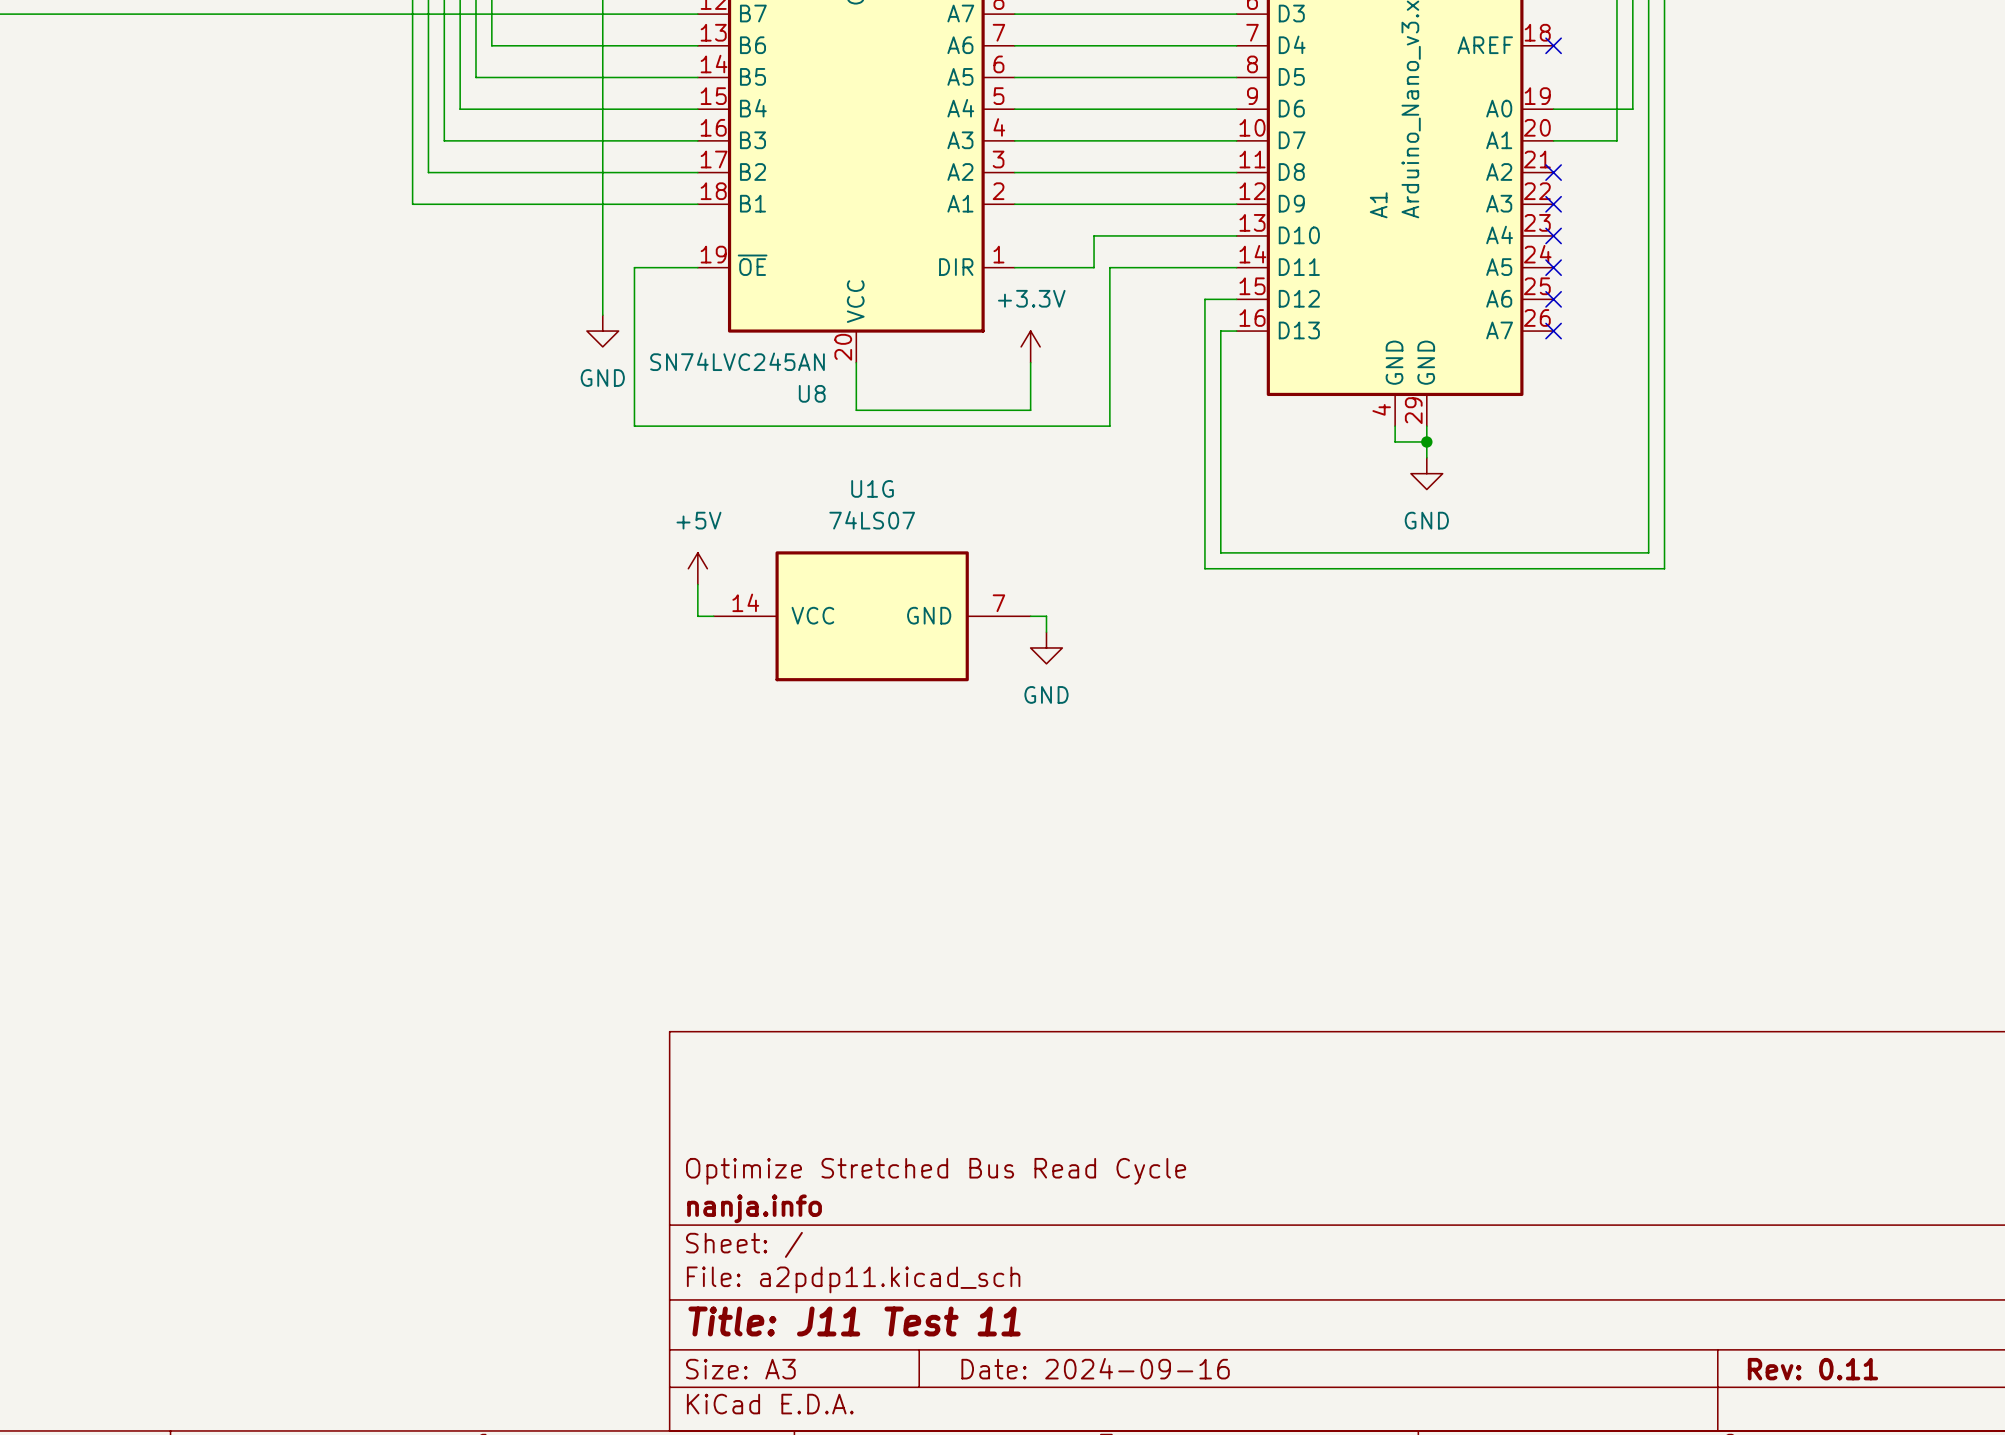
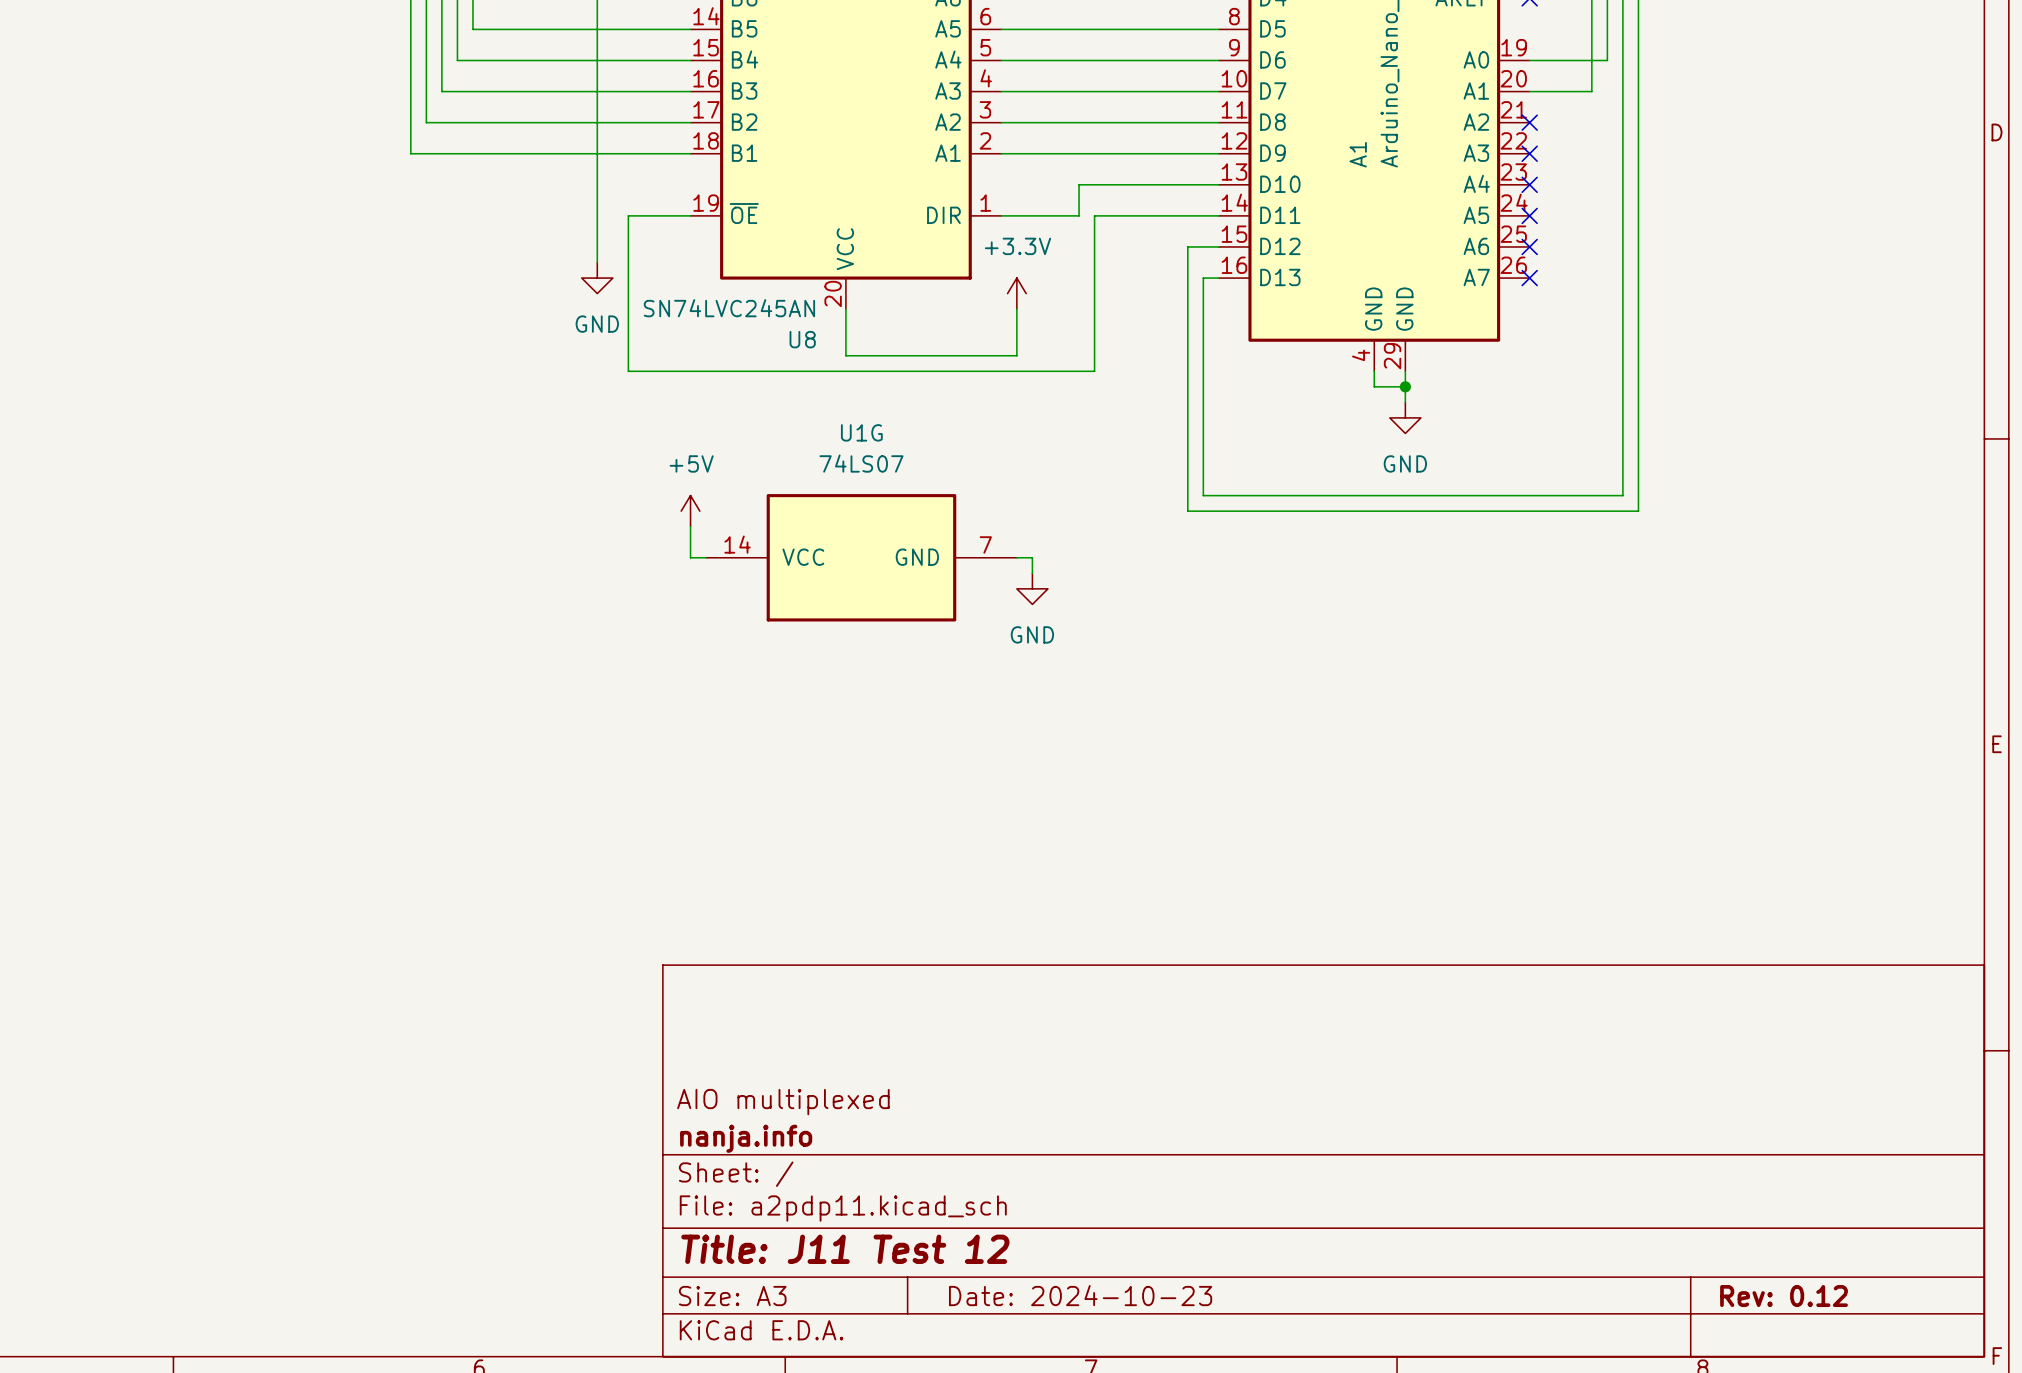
title block: Optimize Stretched Bus Read Cycle (936, 1171) -> AIO multiplexed (783, 1102)
title block: Title: J11 Test 11 (854, 1321) -> Title: J11 Test 12 (845, 1249)
title block: Date: 2024-09-16 (1095, 1368) -> Date: 2024-10-23 (1080, 1295)
title block: Rev: 0.11 (1812, 1369) -> Rev: 0.12 (1784, 1296)

